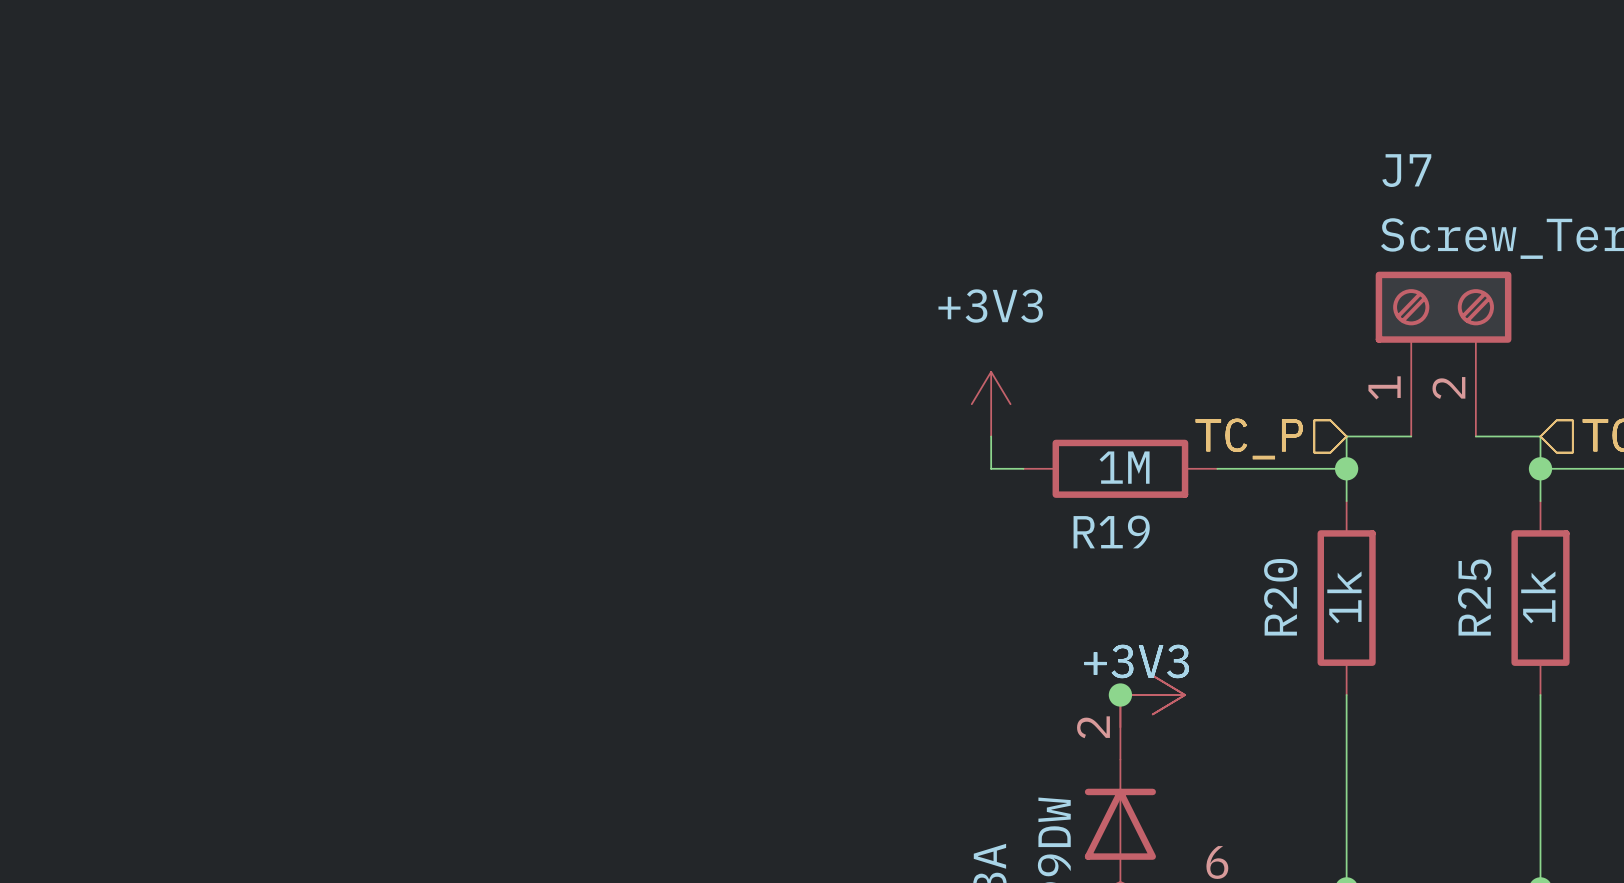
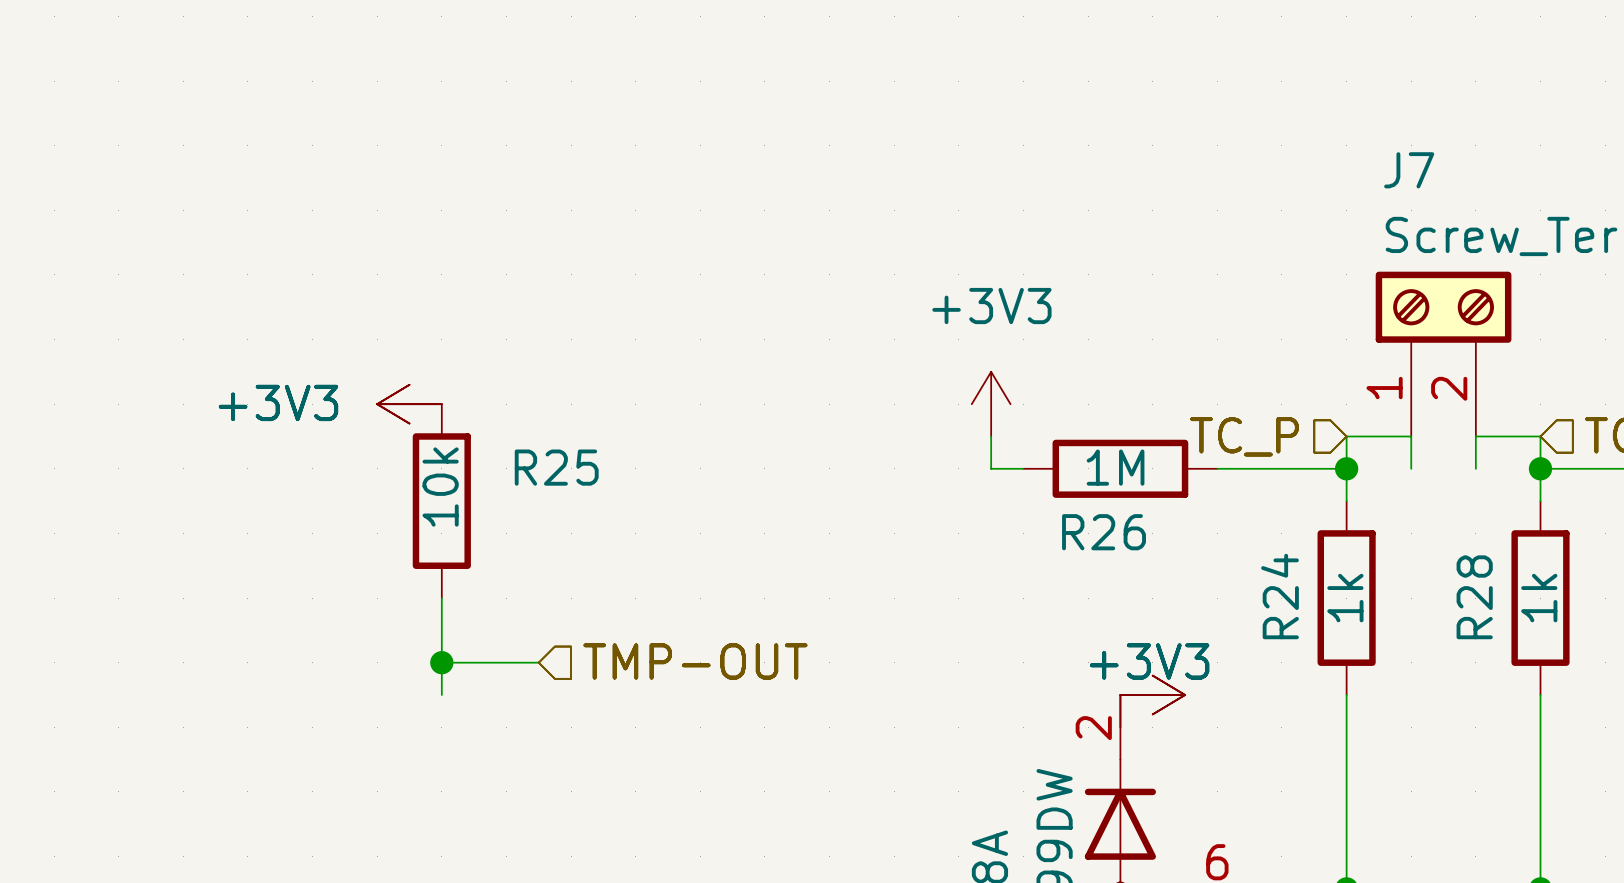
power symbol: none -> +3V3 (409, 404)
wire: none -> (1411, 436) (1411, 468)
wire: none -> (1475, 436) (1475, 468)
R25: none -> 10k (441, 501)
R19 name: R19 (1111, 531) -> R26 (1104, 532)
R20 name: R20 (1280, 597) -> R24 (1280, 596)
R25 name: R25 (1474, 597) -> R28 (1474, 597)
wire: none -> (441, 598) (441, 695)
hierarchical label: none -> TMP-OUT (695, 661)
wire: none -> (441, 662) (538, 662)
junction: none -> (441, 662)
junction: (1120, 695) -> none

